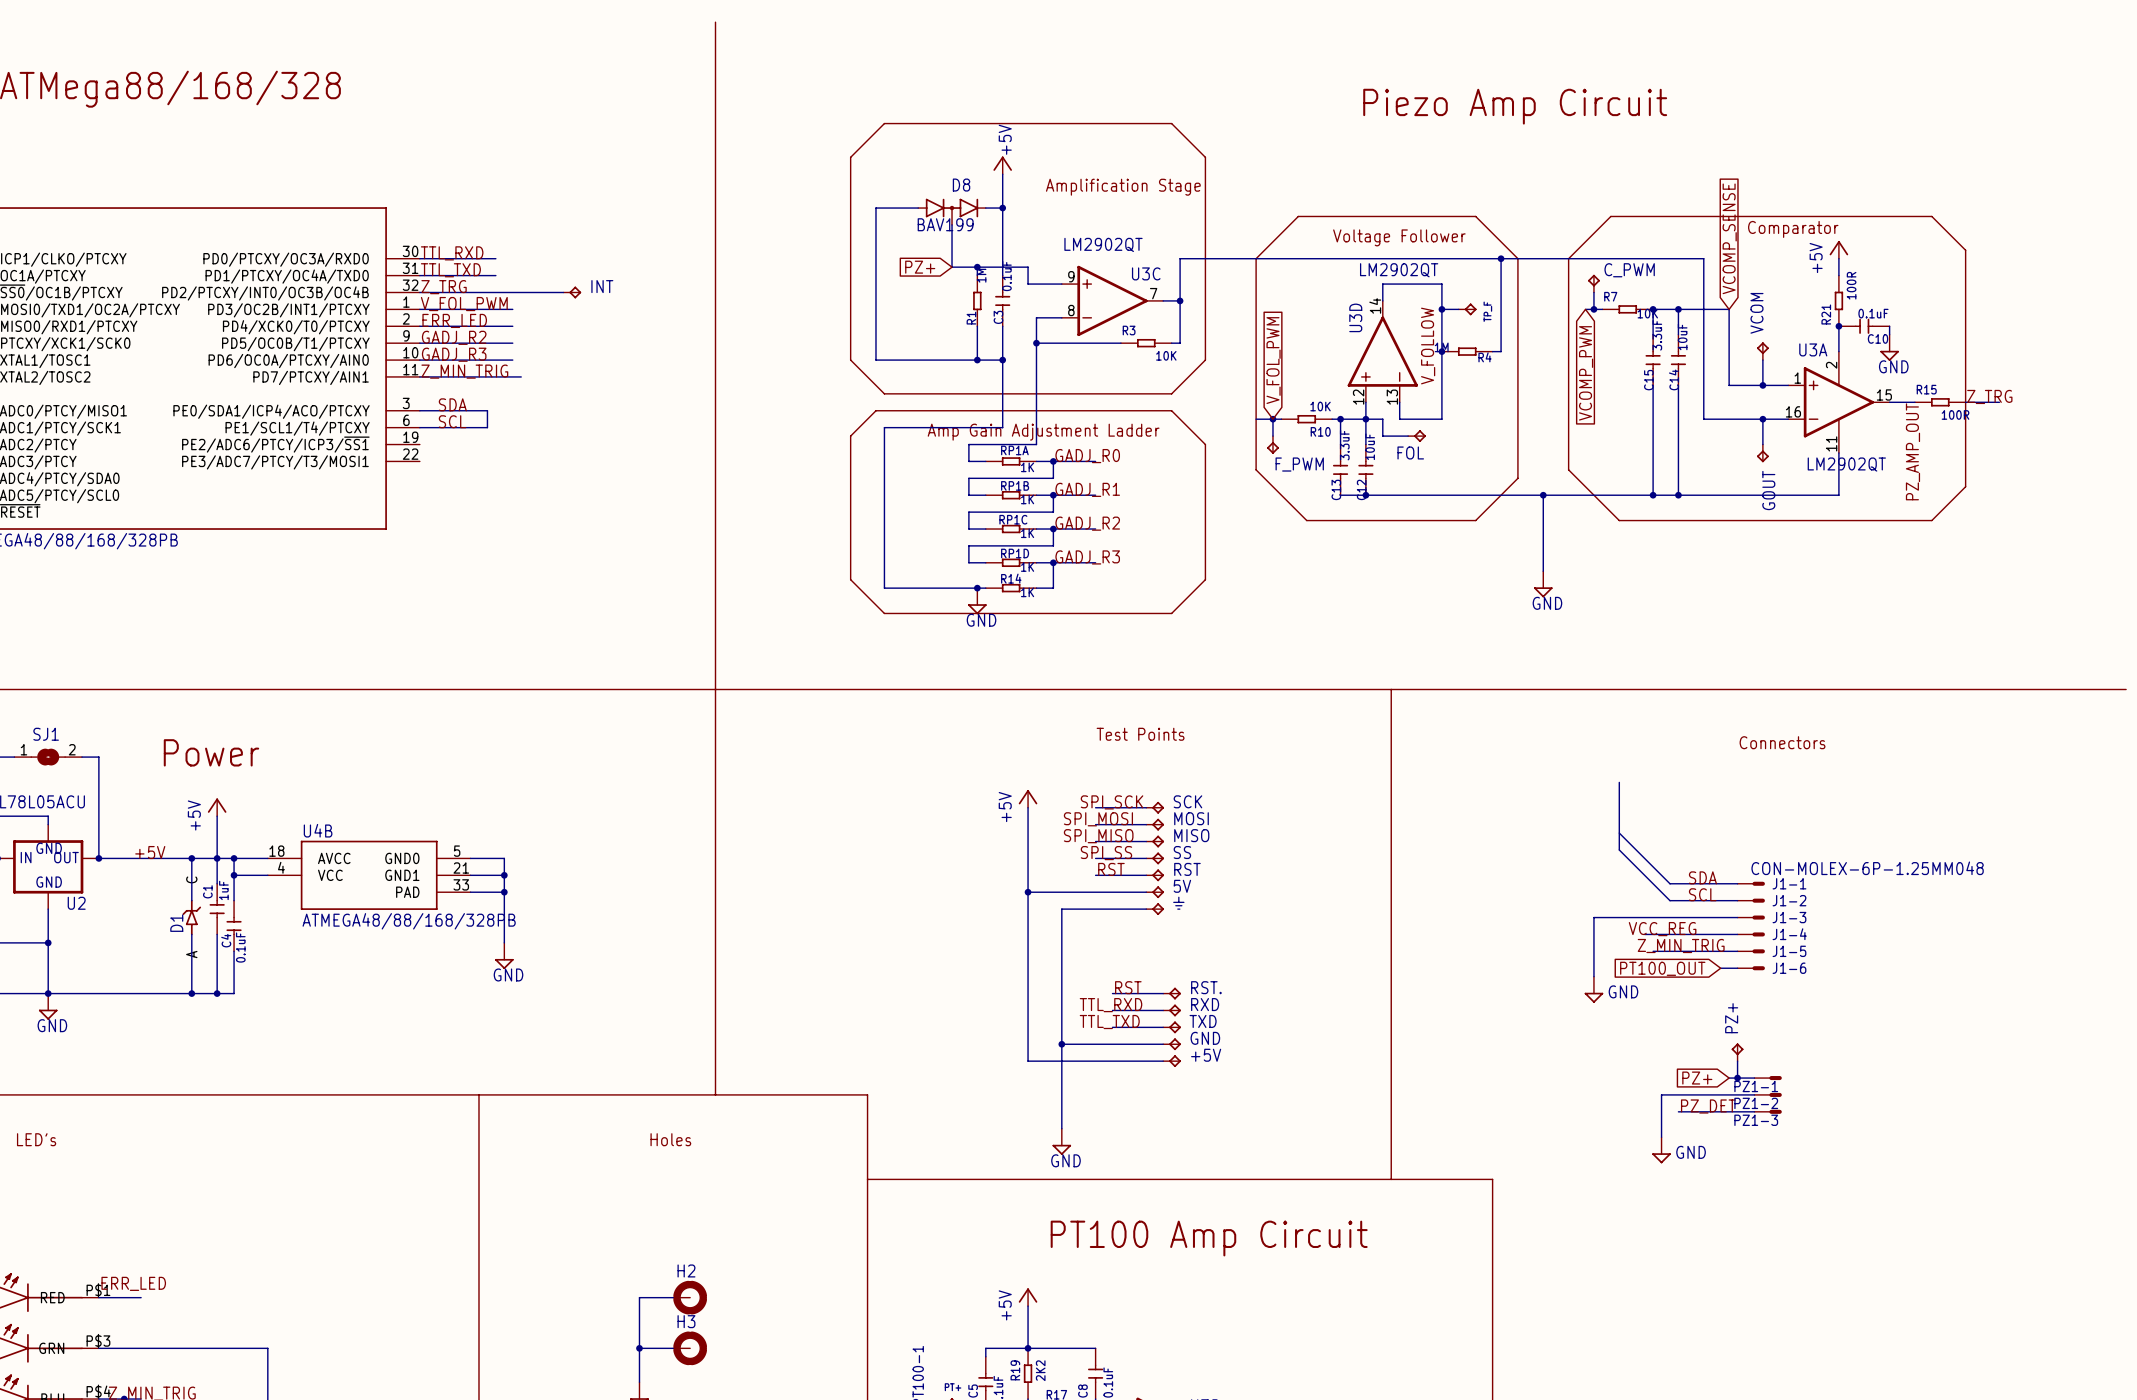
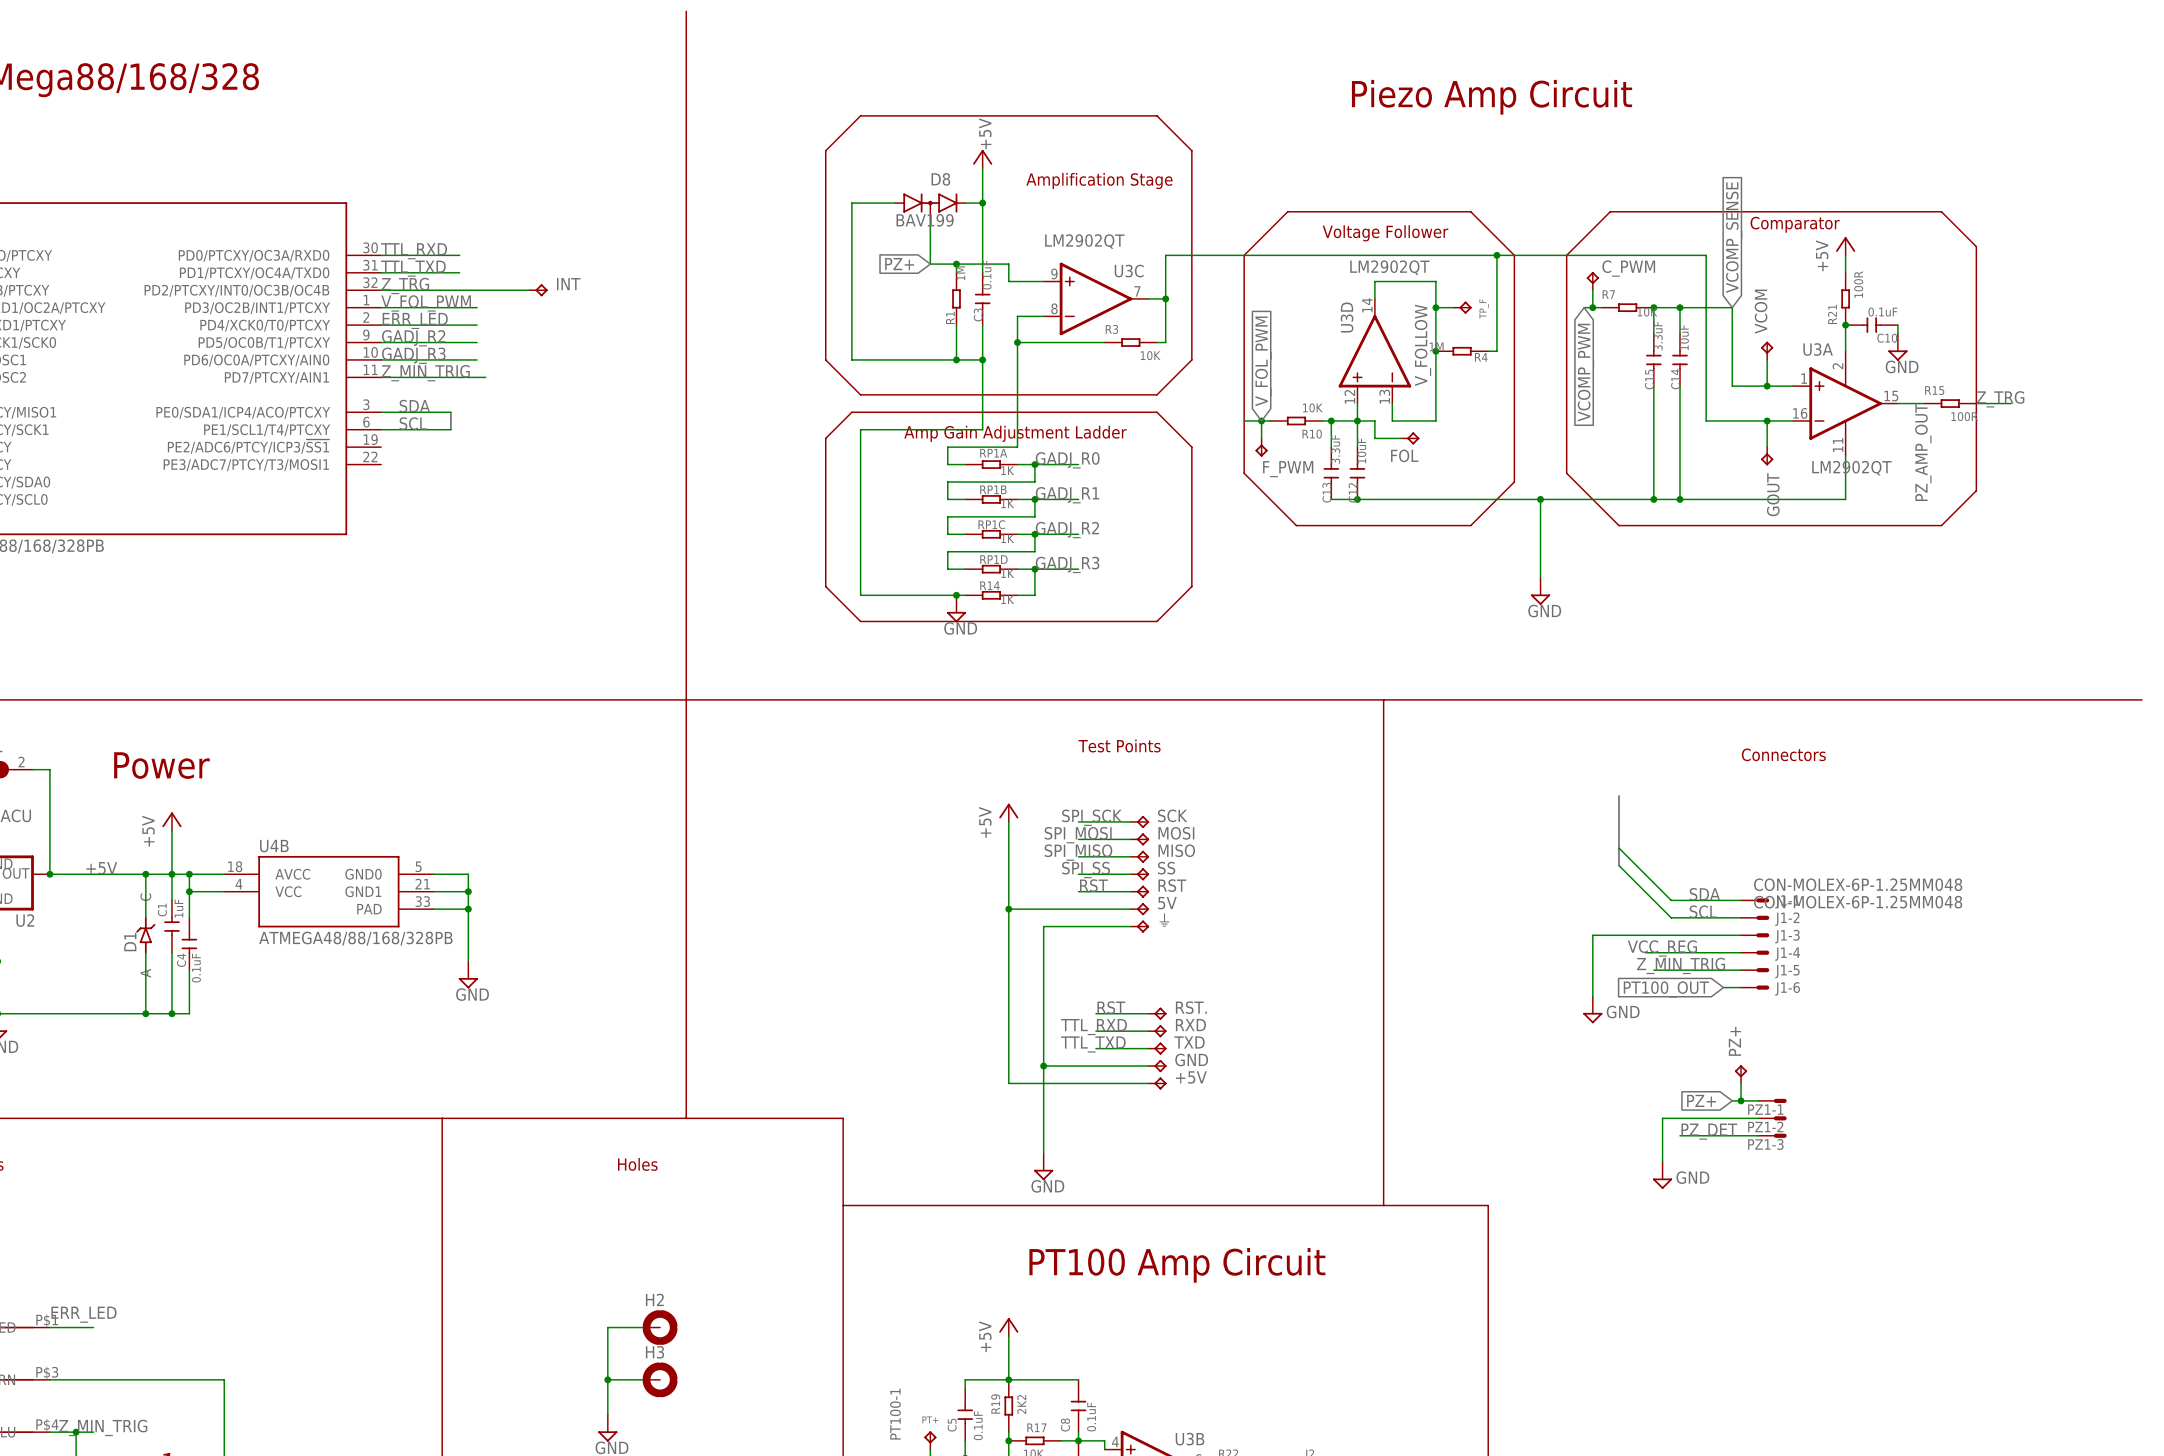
J1-2 value: none -> CON-MOLEX-6P-1.25MM048 (1858, 902)

